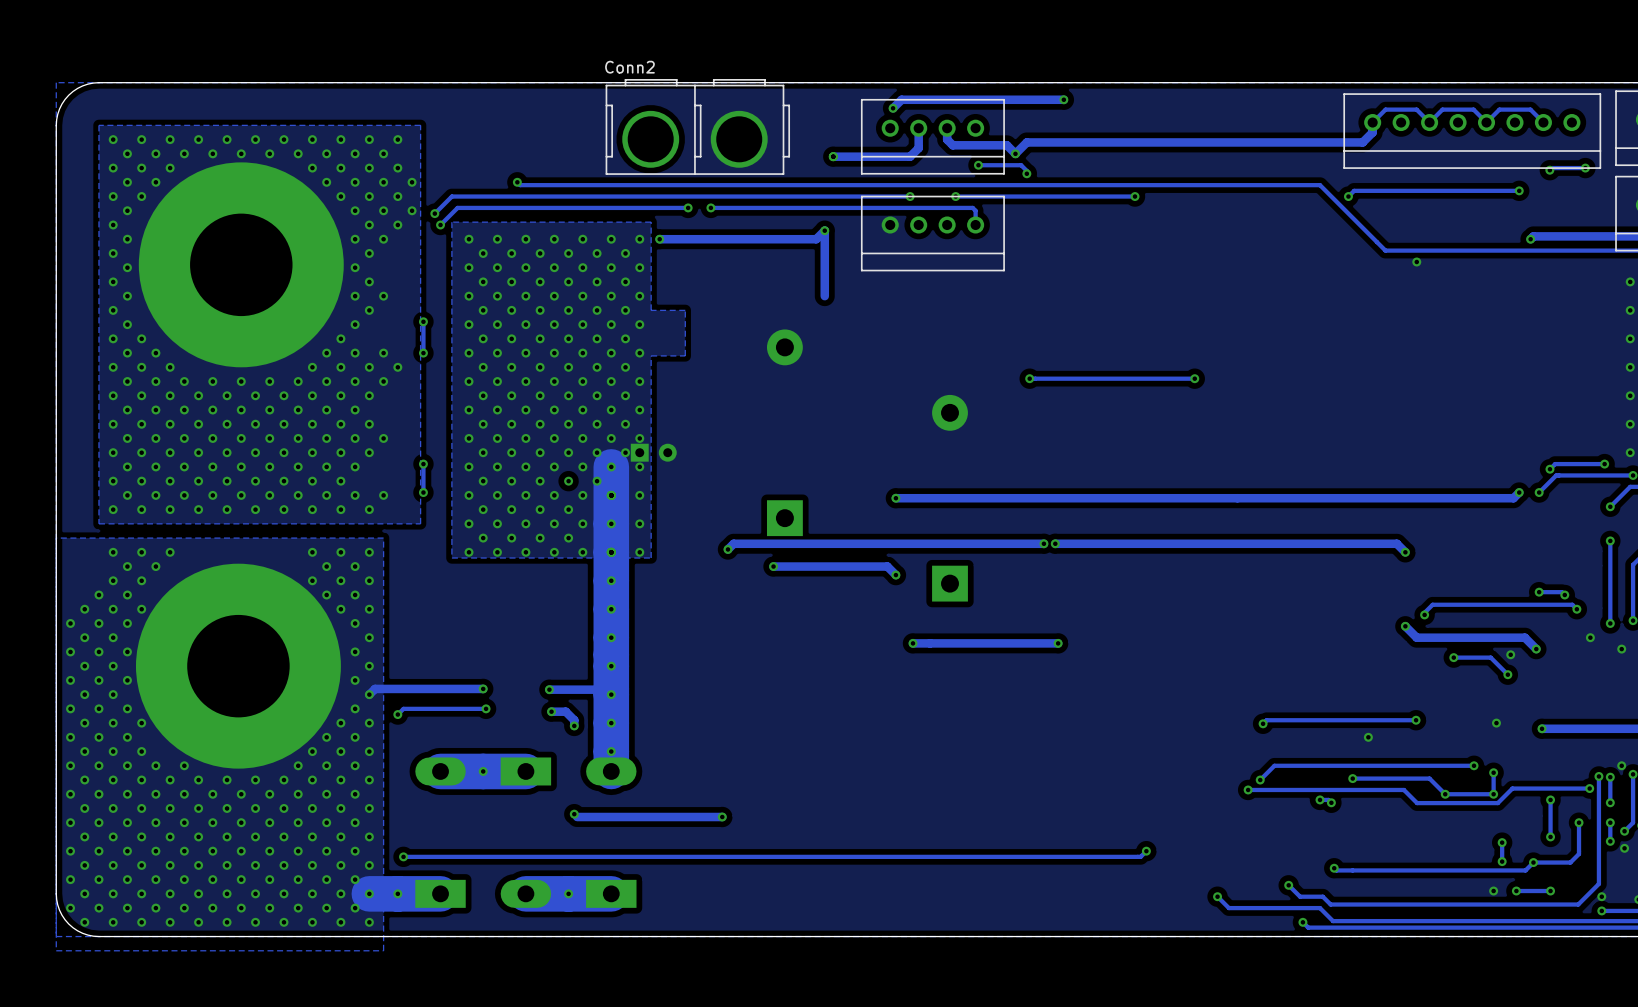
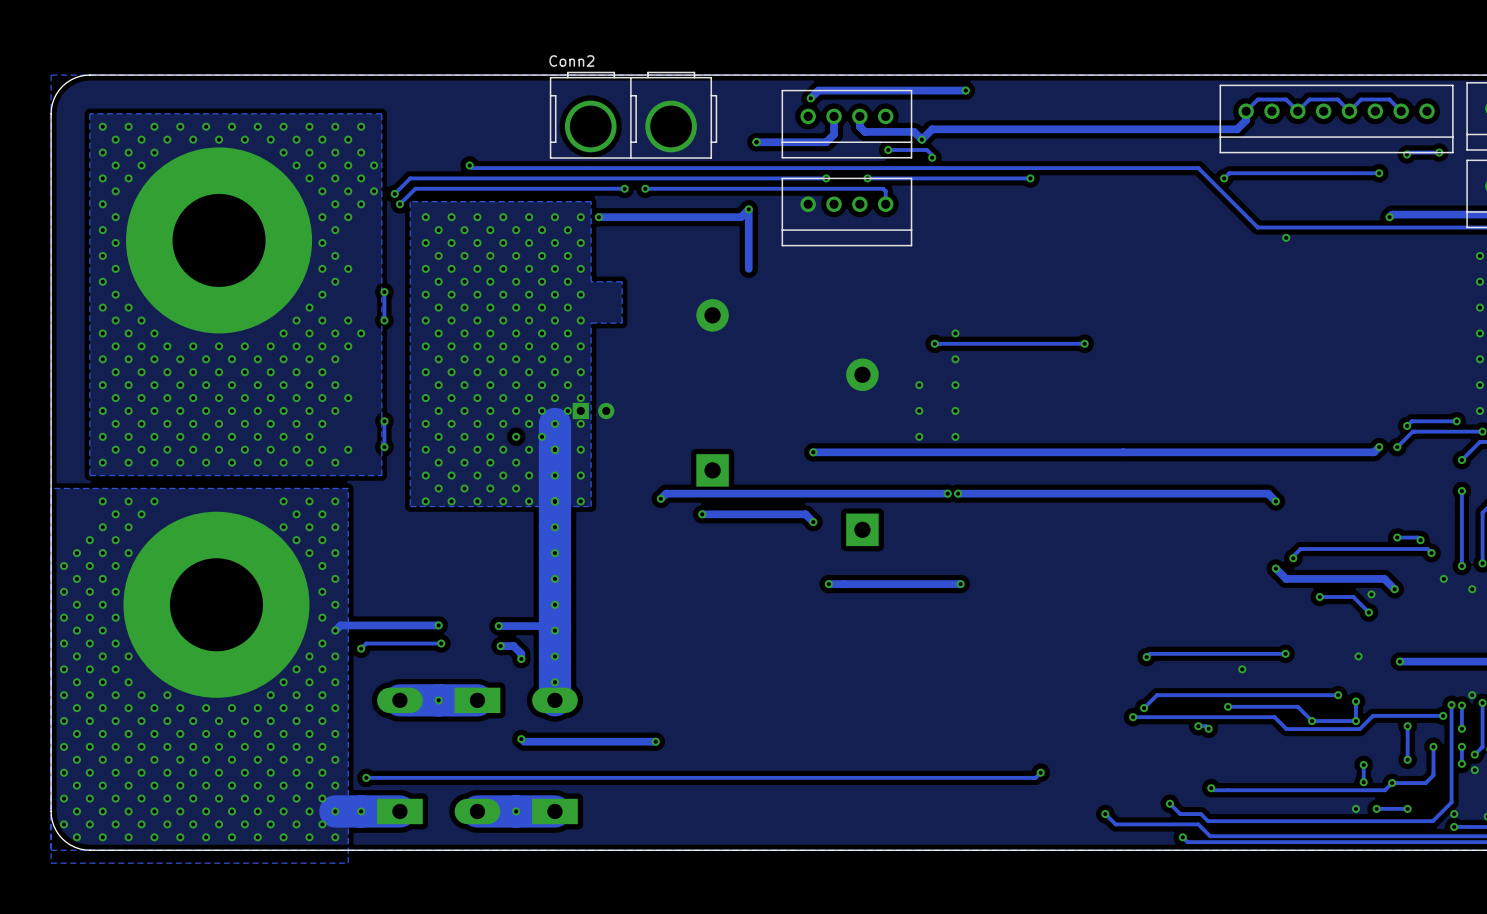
via: none -> (955, 333)
via: none -> (955, 359)
via: none -> (919, 385)
via: none -> (955, 385)
via: none -> (919, 410)
via: none -> (955, 410)
via: none -> (919, 436)
via: none -> (955, 436)

